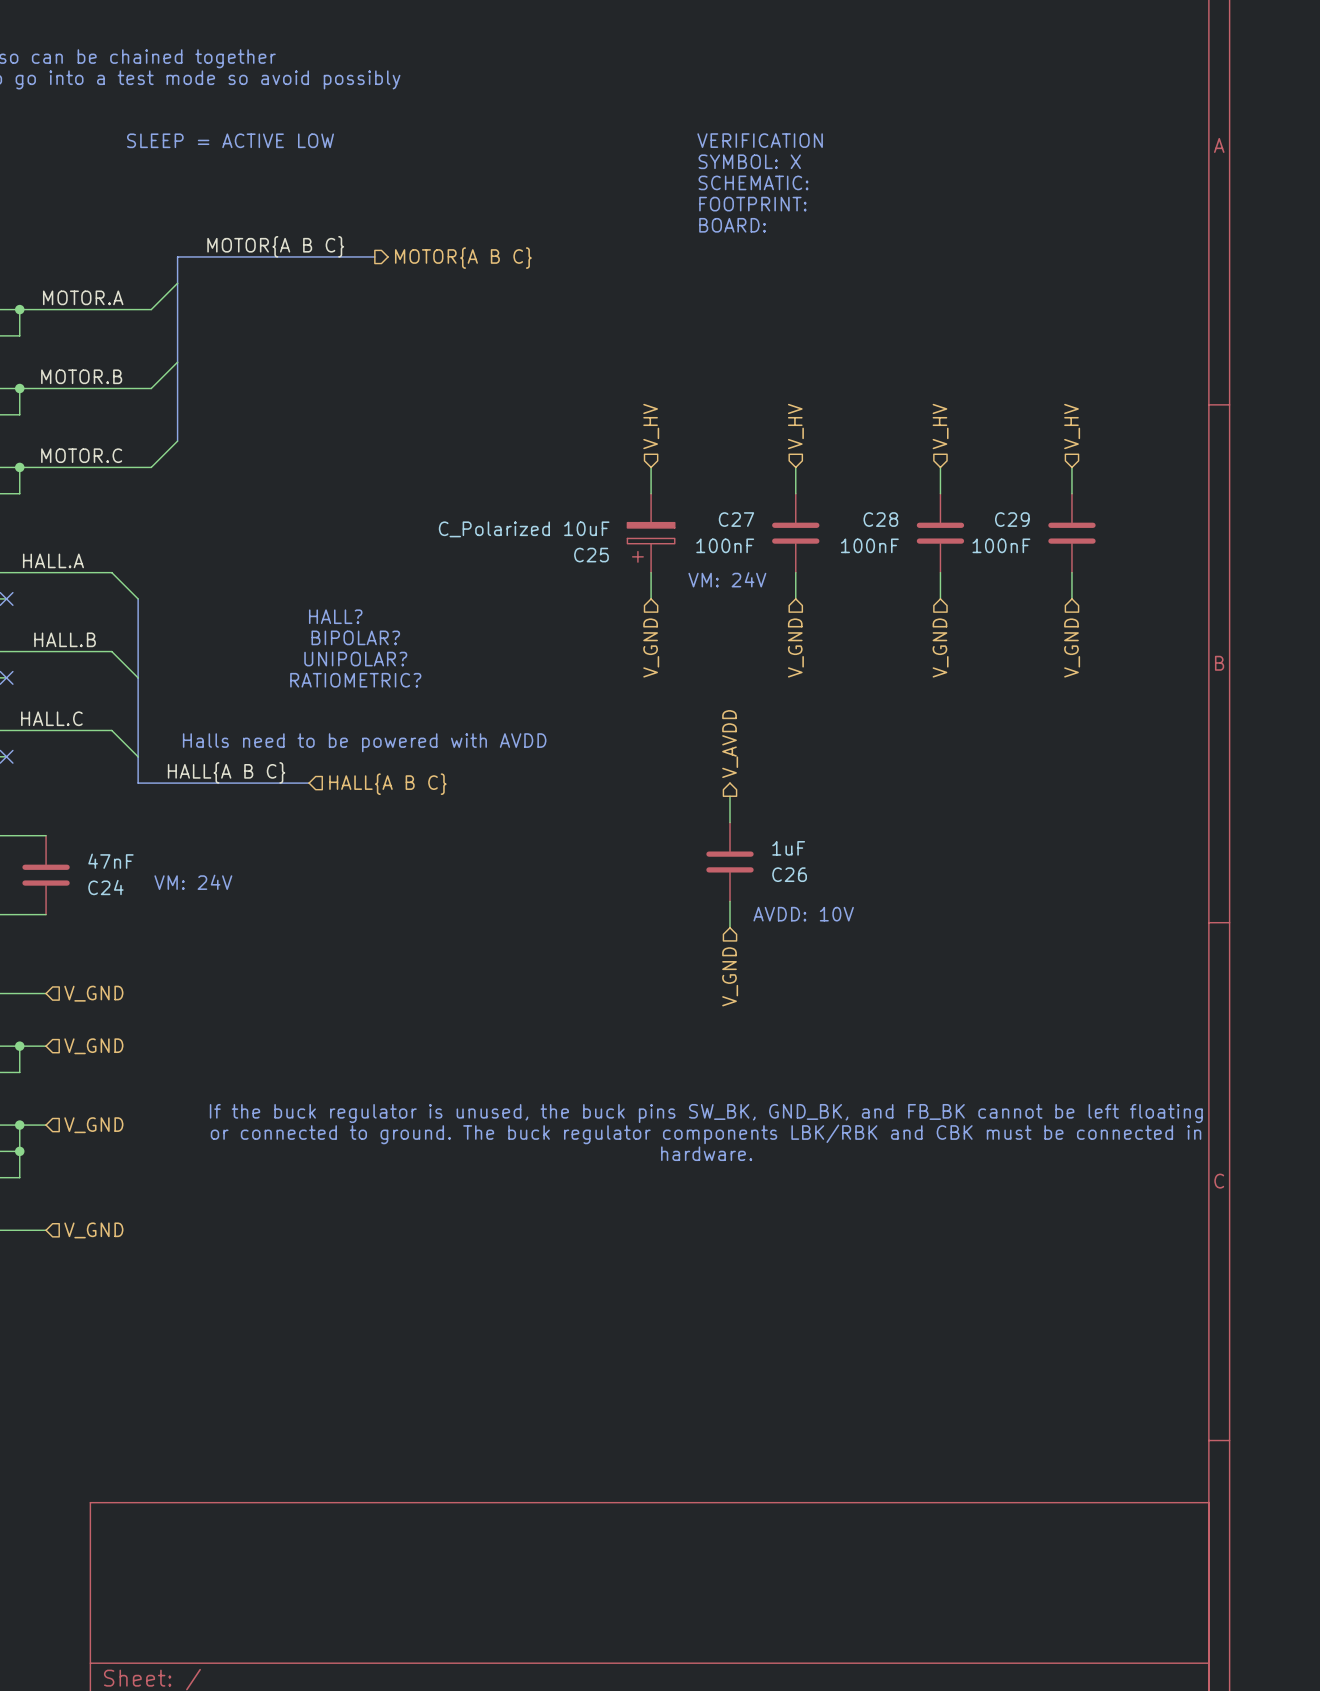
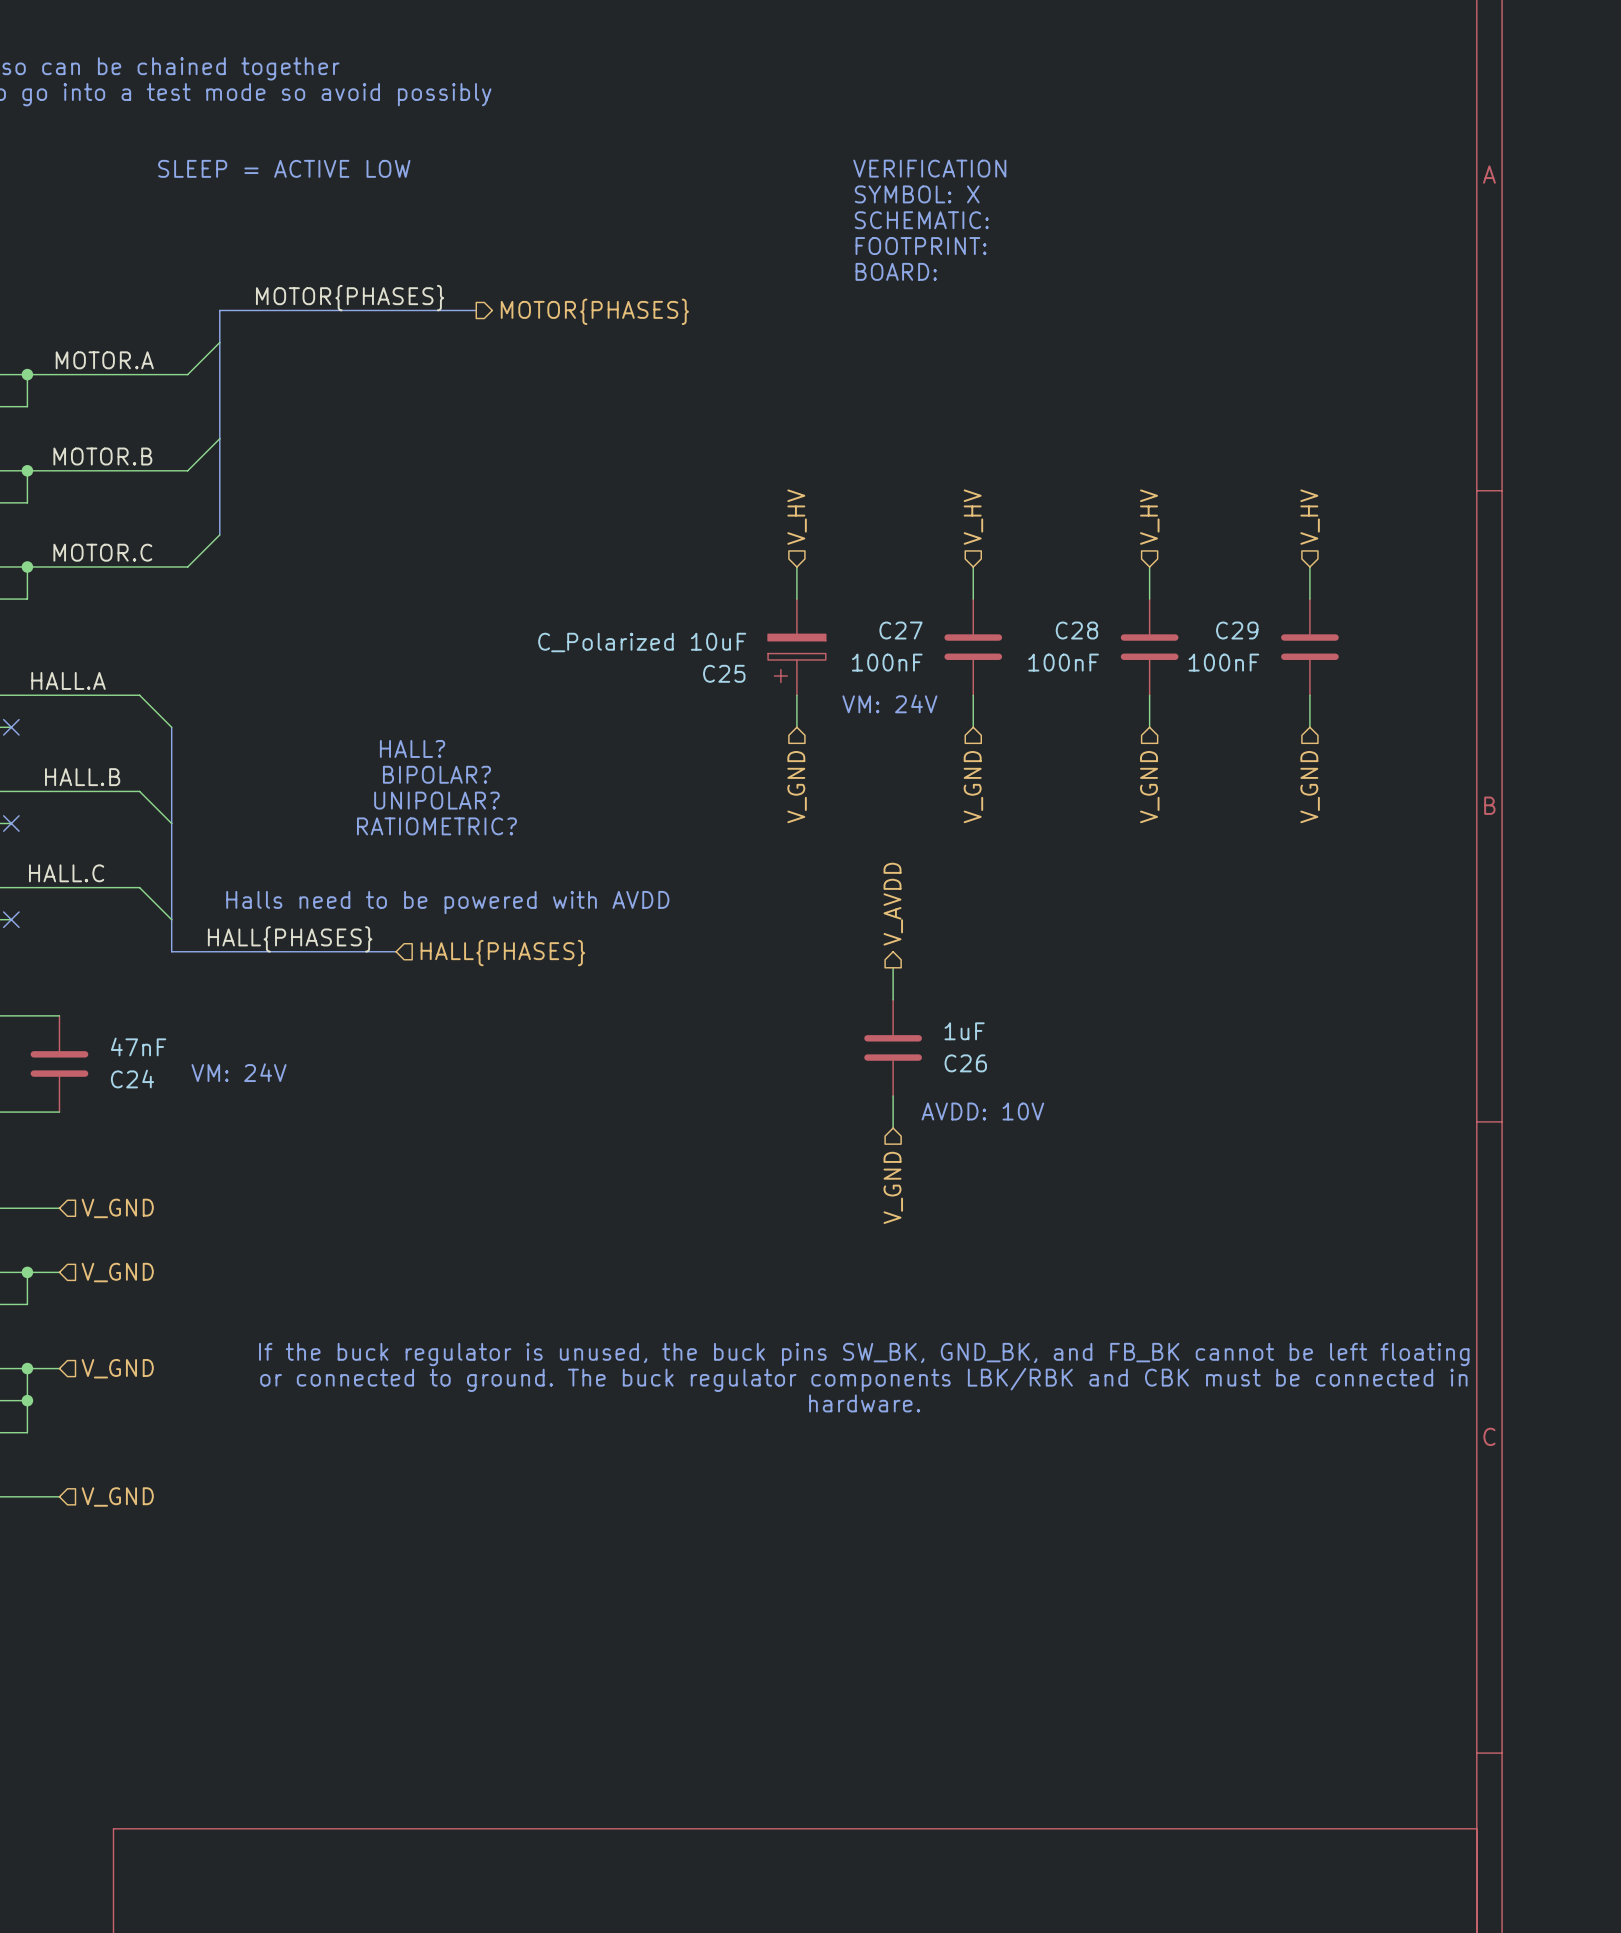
label: MOTOR{A B C} (275, 246) -> MOTOR{PHASES} (350, 298)
bus: none -> (460, 310) (476, 310)
hierarchical label: MOTOR{A B C} (463, 258) -> MOTOR{PHASES} (594, 311)
label: HALL{A B C} (226, 772) -> HALL{PHASES} (290, 939)
bus: none -> (380, 951) (396, 951)
hierarchical label: HALL{A B C} (387, 784) -> HALL{PHASES} (502, 953)

